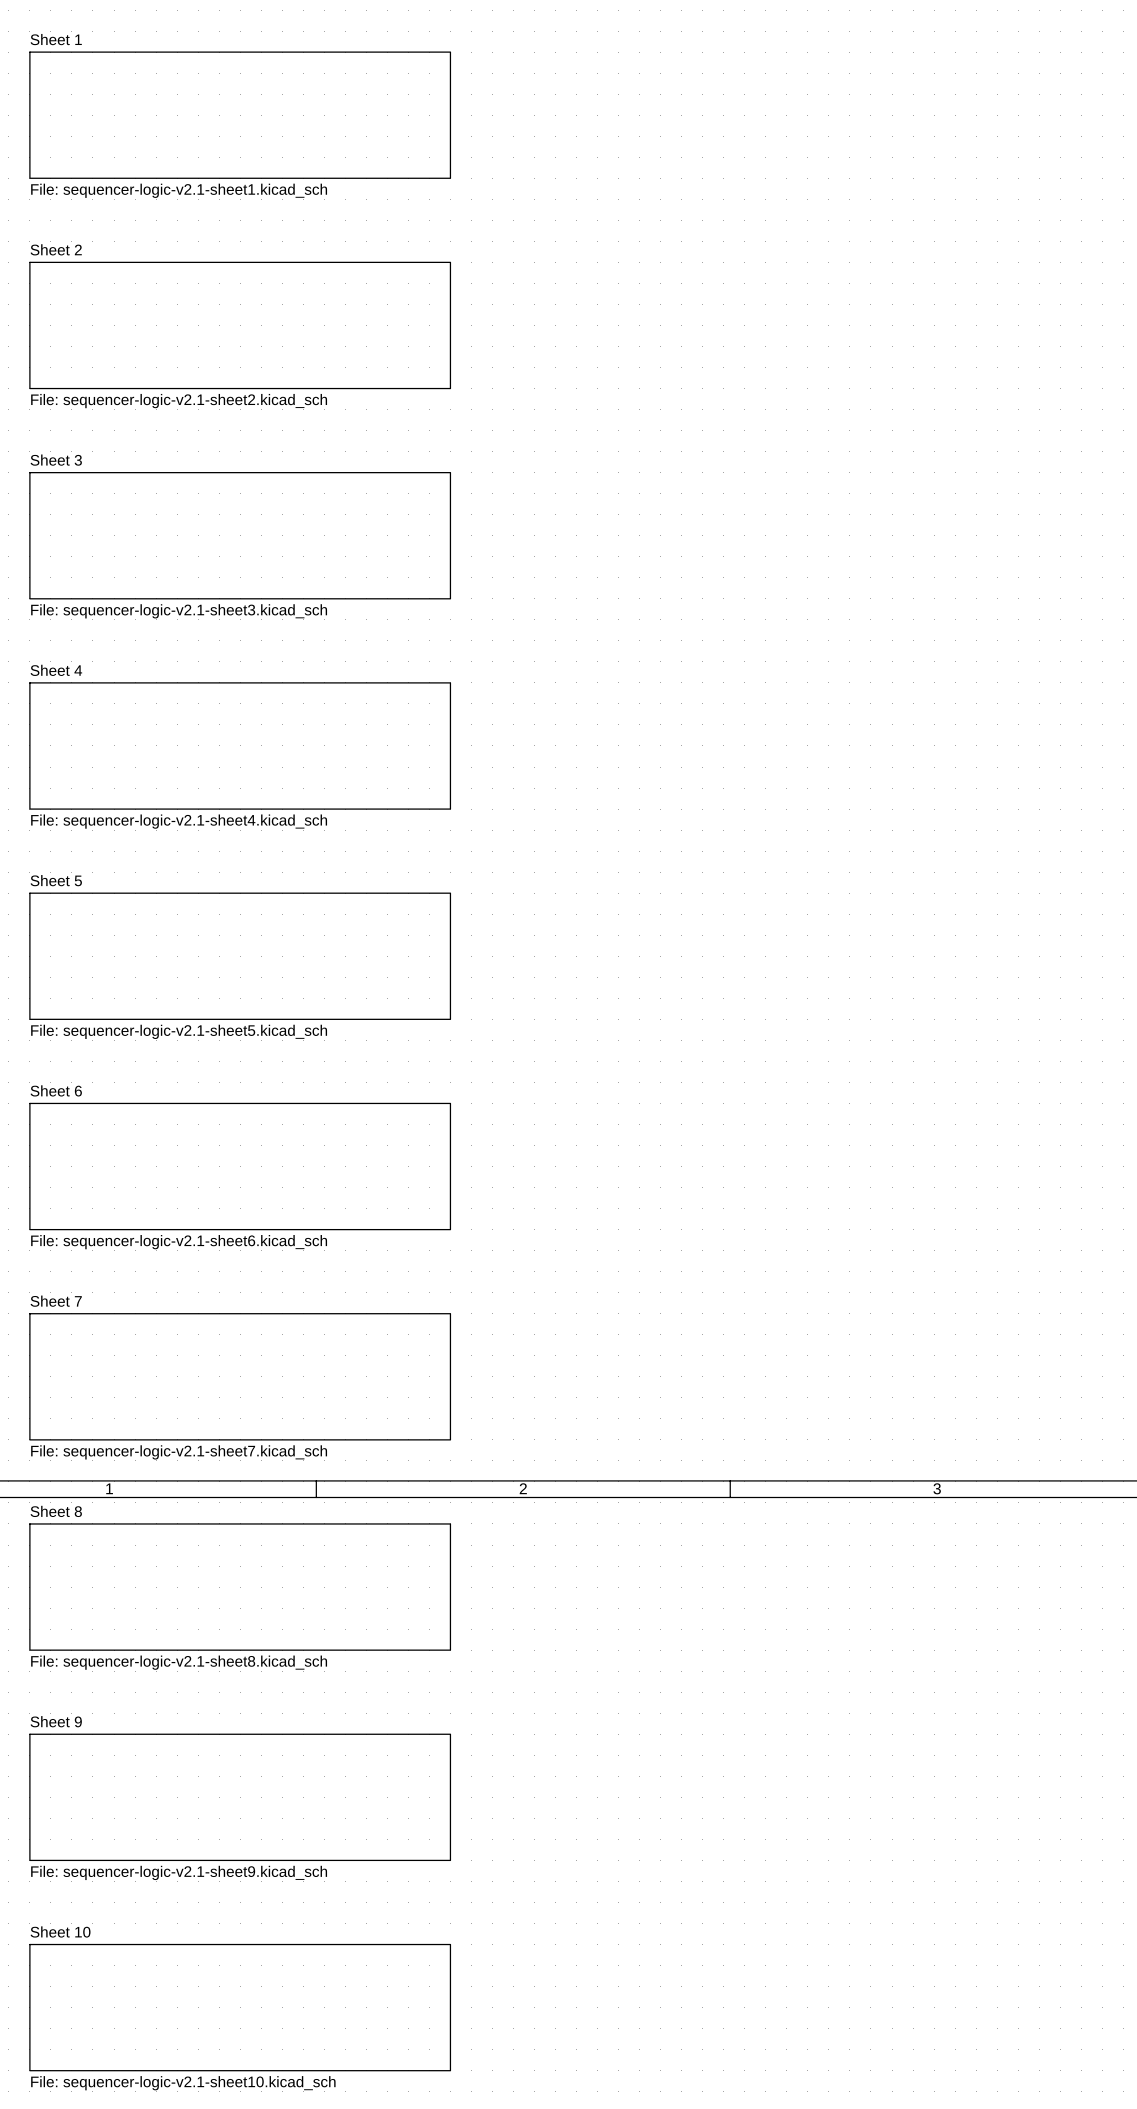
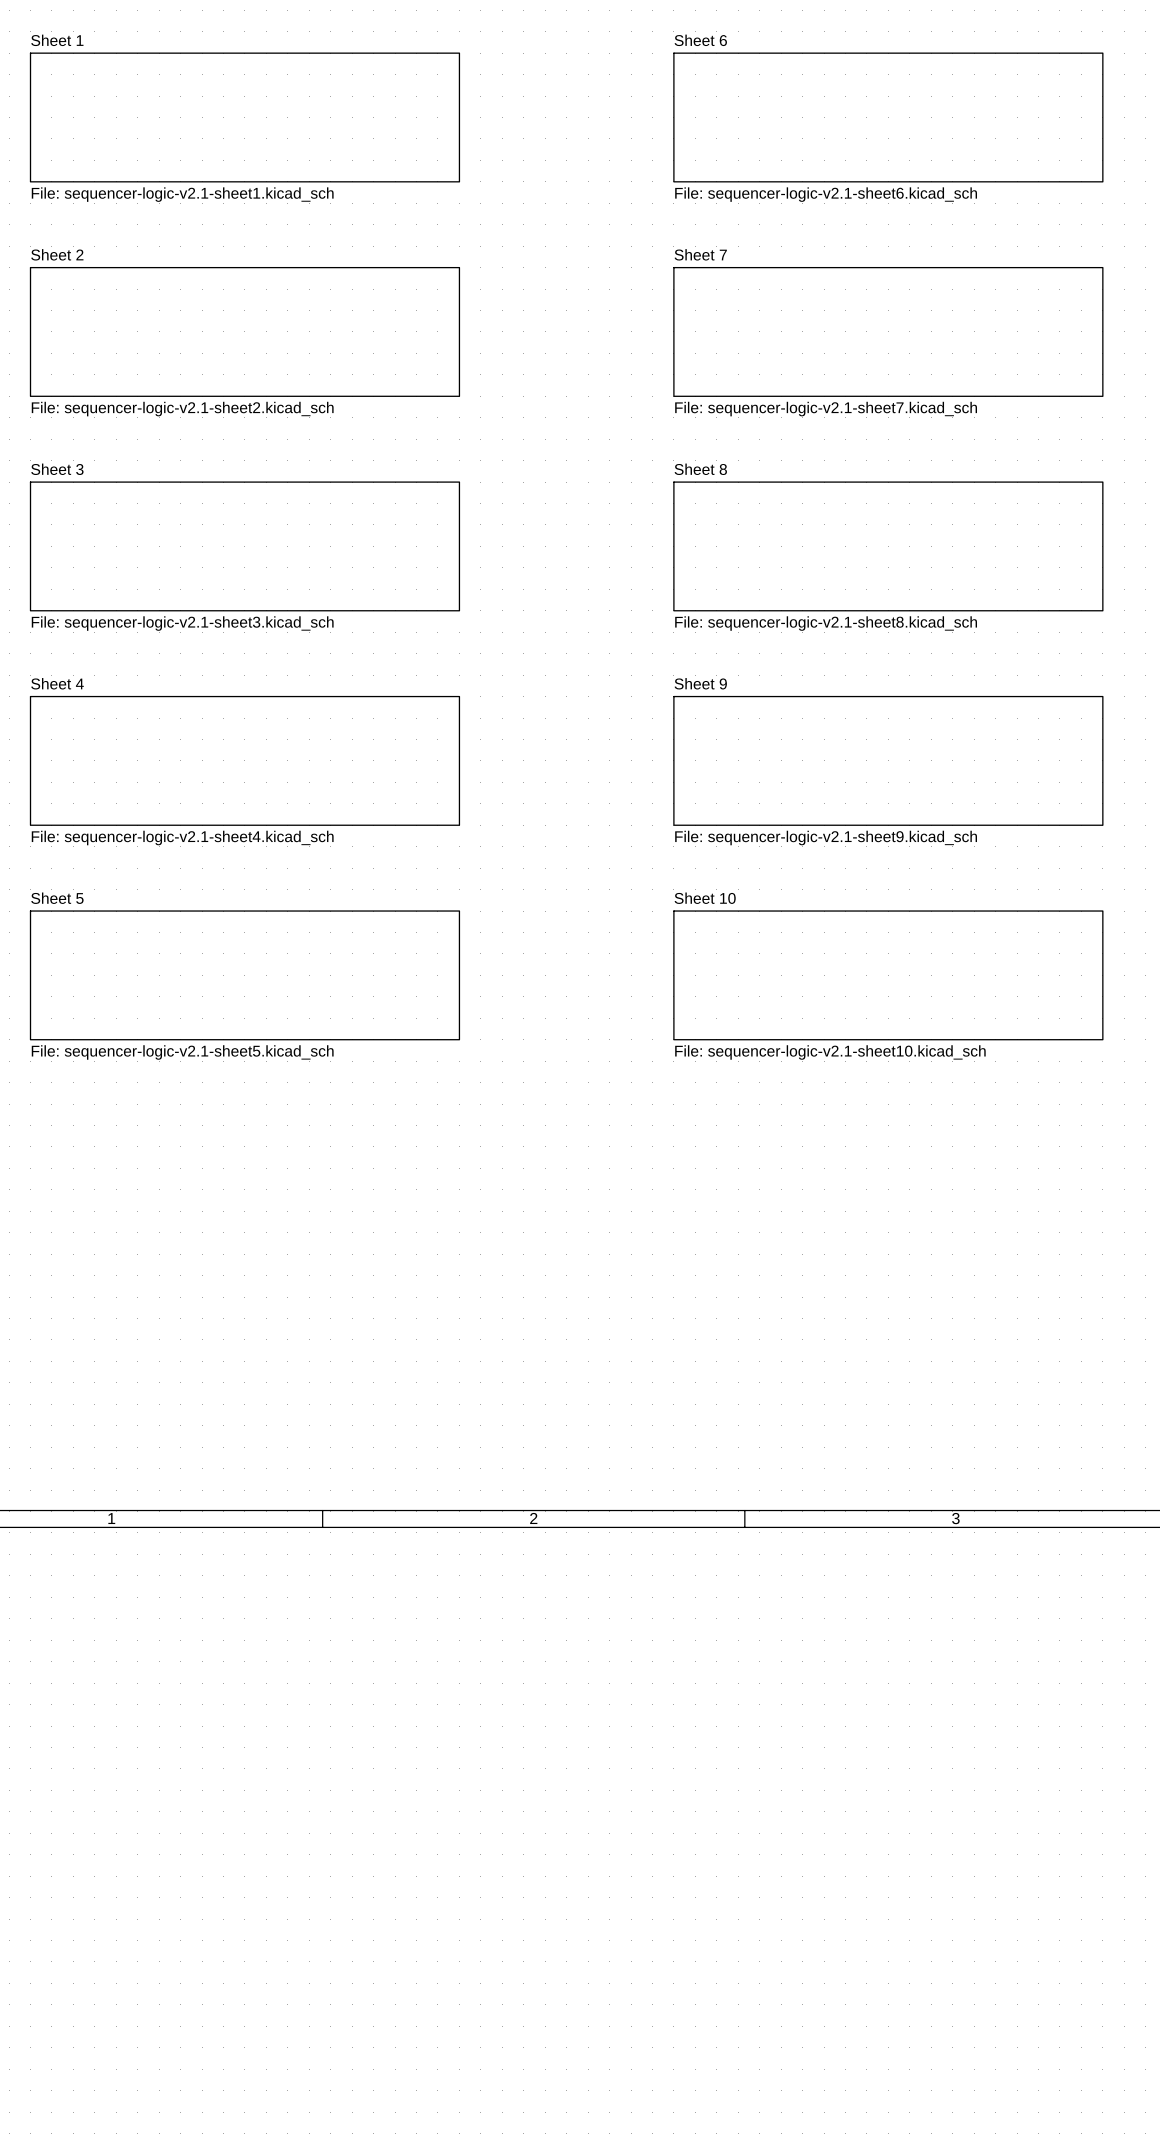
sheet Sheet 6 position: (240, 1166) -> (888, 117)
sheet Sheet 7 position: (240, 1376) -> (888, 331)
sheet Sheet 8 position: (240, 1587) -> (888, 546)
sheet Sheet 9 position: (240, 1797) -> (888, 760)
sheet Sheet 10 position: (240, 2007) -> (888, 975)

